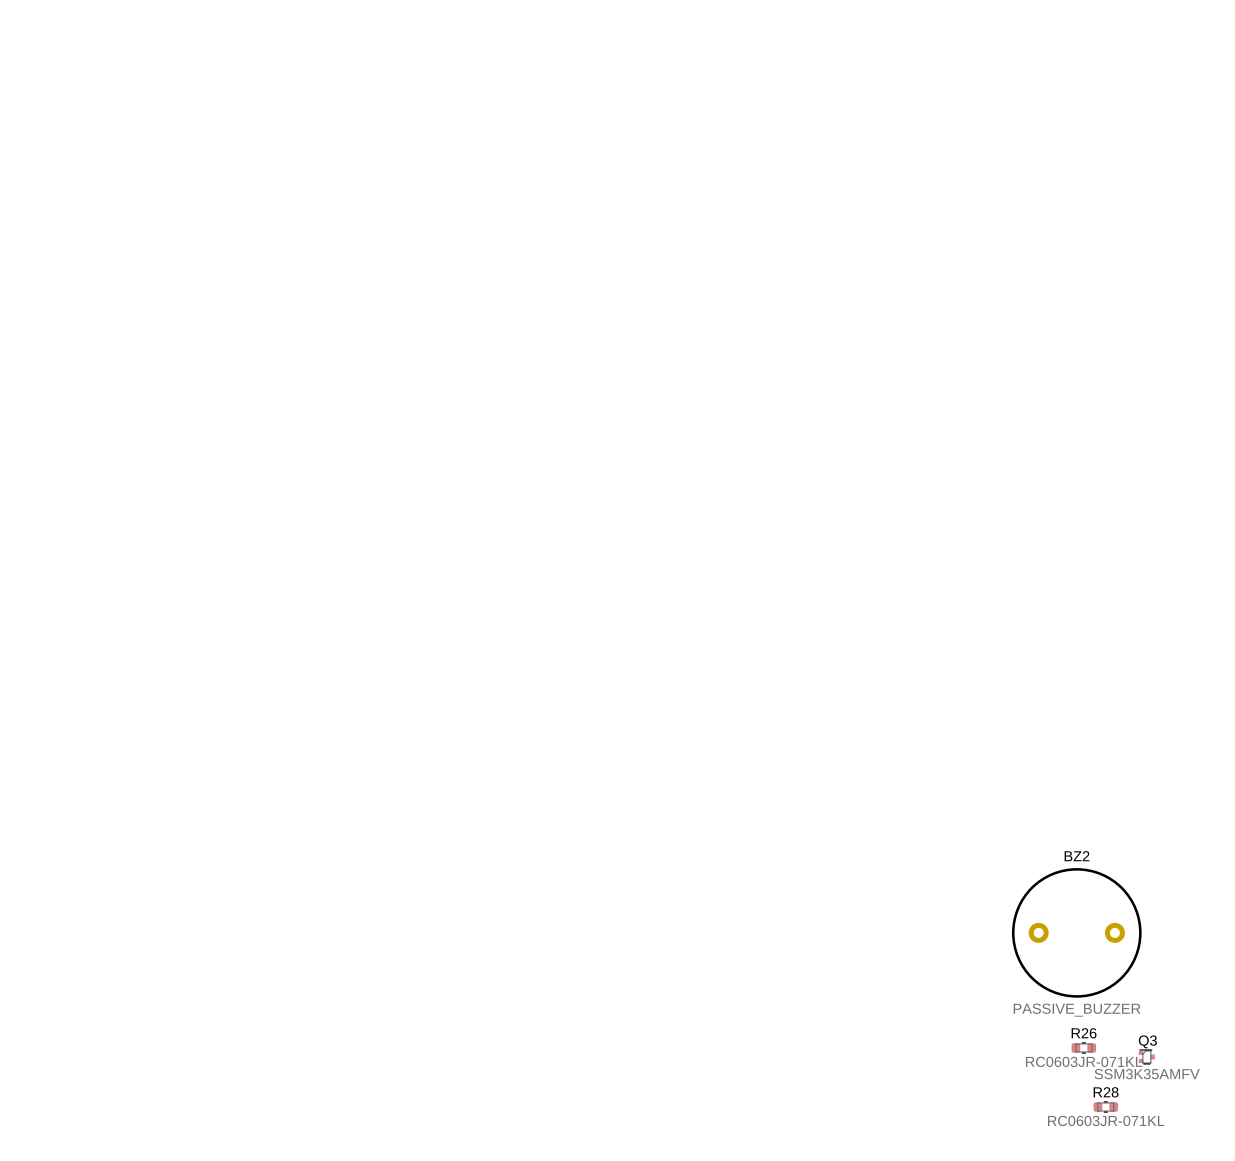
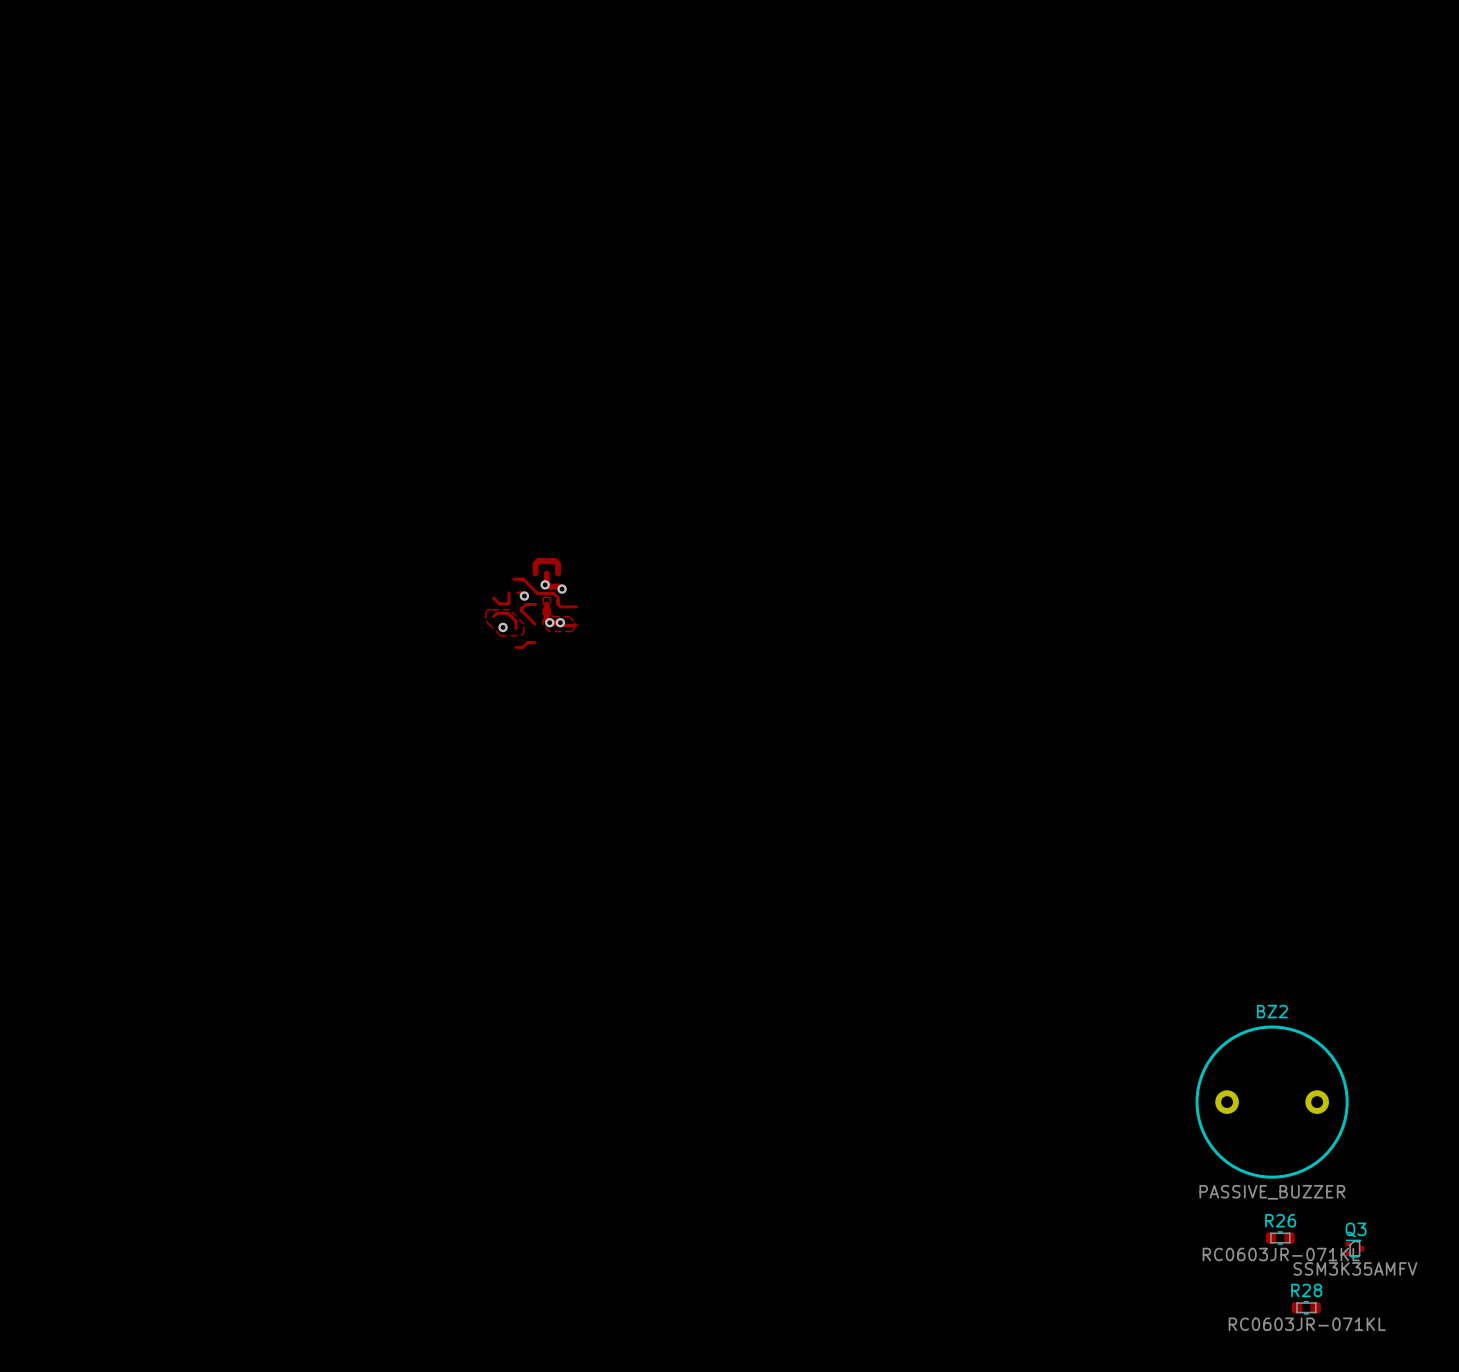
track: none -> (535, 573) (535, 564) (538, 560) (554, 560) (558, 564) (558, 573)
track: none -> (546, 573) (545, 584) (559, 586) (562, 589)
track: none -> (513, 579) (523, 579) (537, 593) (553, 593) (558, 597) (558, 604) (560, 606) (576, 606)
via: none -> (545, 584)
via: none -> (562, 589)
track: none -> (508, 592) (508, 603) (499, 603) (493, 598)
track: none -> (518, 592) (524, 596)
via: none -> (524, 596)
zone outline: none -> (543, 597) (543, 625) (549, 631) (571, 631) (574, 628) (574, 622) (569, 616) (553, 616) (550, 613) (550, 597) (543, 597)
track: none -> (535, 604) (525, 604) (521, 608)
track: none -> (546, 604) (546, 619) (549, 622) (576, 625)
track: none -> (521, 608) (534, 624)
zone outline: none -> (488, 609) (509, 609) (523, 623) (523, 633) (521, 635) (500, 635) (485, 620) (485, 612) (488, 609)
track: none -> (493, 616) (496, 613) (508, 613) (516, 621) (516, 628)
via: none -> (549, 622)
via: none -> (560, 622)
via: none -> (503, 627)
track: none -> (534, 642) (527, 642) (522, 647) (516, 647)

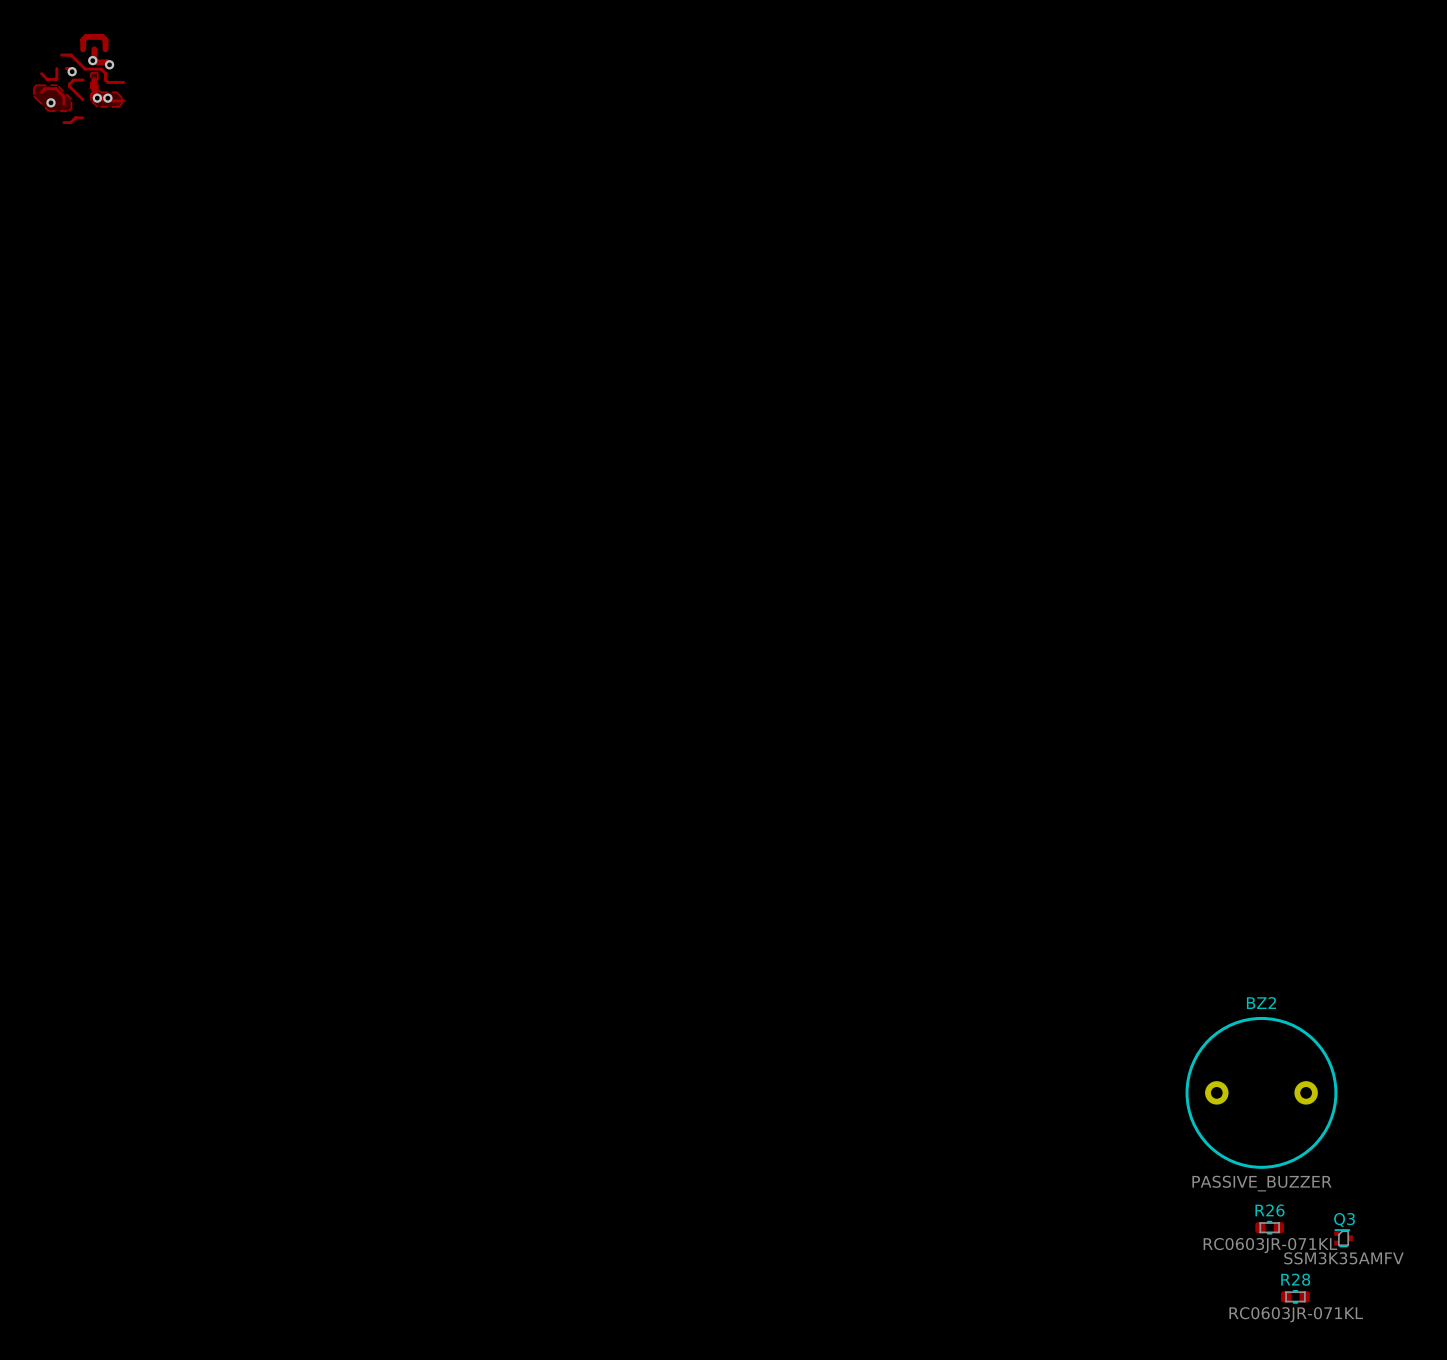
track: none -> (83, 49) (83, 40) (86, 36) (102, 36) (105, 40) (105, 49)
track: none -> (94, 49) (92, 60) (107, 62) (109, 64)
track: none -> (61, 55) (71, 55) (85, 69) (101, 69) (105, 73) (105, 80) (107, 82) (123, 82)
via: none -> (92, 60)
via: none -> (109, 64)
track: none -> (56, 68) (55, 79) (47, 79) (41, 73)
track: none -> (66, 68) (72, 71)
via: none -> (72, 71)
zone outline: none -> (90, 72) (90, 100) (97, 106) (118, 106) (121, 103) (121, 97) (116, 92) (100, 92) (97, 89) (97, 72) (90, 72)
track: none -> (83, 80) (73, 80) (69, 84)
track: none -> (94, 80) (94, 95) (97, 98) (123, 100)
track: none -> (69, 84) (82, 99)
zone outline: none -> (36, 85) (57, 85) (71, 99) (71, 108) (69, 111) (48, 111) (34, 96) (34, 87) (36, 85)
track: none -> (41, 92) (44, 88) (55, 88) (63, 96) (63, 104)
via: none -> (97, 98)
via: none -> (107, 98)
via: none -> (51, 102)
track: none -> (82, 117) (75, 117) (70, 122) (63, 122)
track: (535, 573) (535, 564) (538, 560) (554, 560) (558, 564) (558, 573) -> none
track: (546, 573) (545, 584) (559, 586) (562, 589) -> none
track: (513, 579) (523, 579) (537, 593) (553, 593) (558, 597) (558, 604) (560, 606) (576, 606) -> none
via: (545, 584) -> none
via: (562, 589) -> none
track: (508, 592) (508, 603) (499, 603) (493, 598) -> none
track: (518, 592) (524, 596) -> none
via: (524, 596) -> none
zone outline: (543, 597) (543, 625) (549, 631) (571, 631) (574, 628) (574, 622) (569, 616) (553, 616) (550, 613) (550, 597) (543, 597) -> none
track: (535, 604) (525, 604) (521, 608) -> none
track: (546, 604) (546, 619) (549, 622) (576, 625) -> none
track: (521, 608) (534, 624) -> none
zone outline: (488, 609) (509, 609) (523, 623) (523, 633) (521, 635) (500, 635) (485, 620) (485, 612) (488, 609) -> none
track: (493, 616) (496, 613) (508, 613) (516, 621) (516, 628) -> none
via: (549, 622) -> none
via: (560, 622) -> none
via: (503, 627) -> none
track: (534, 642) (527, 642) (522, 647) (516, 647) -> none

